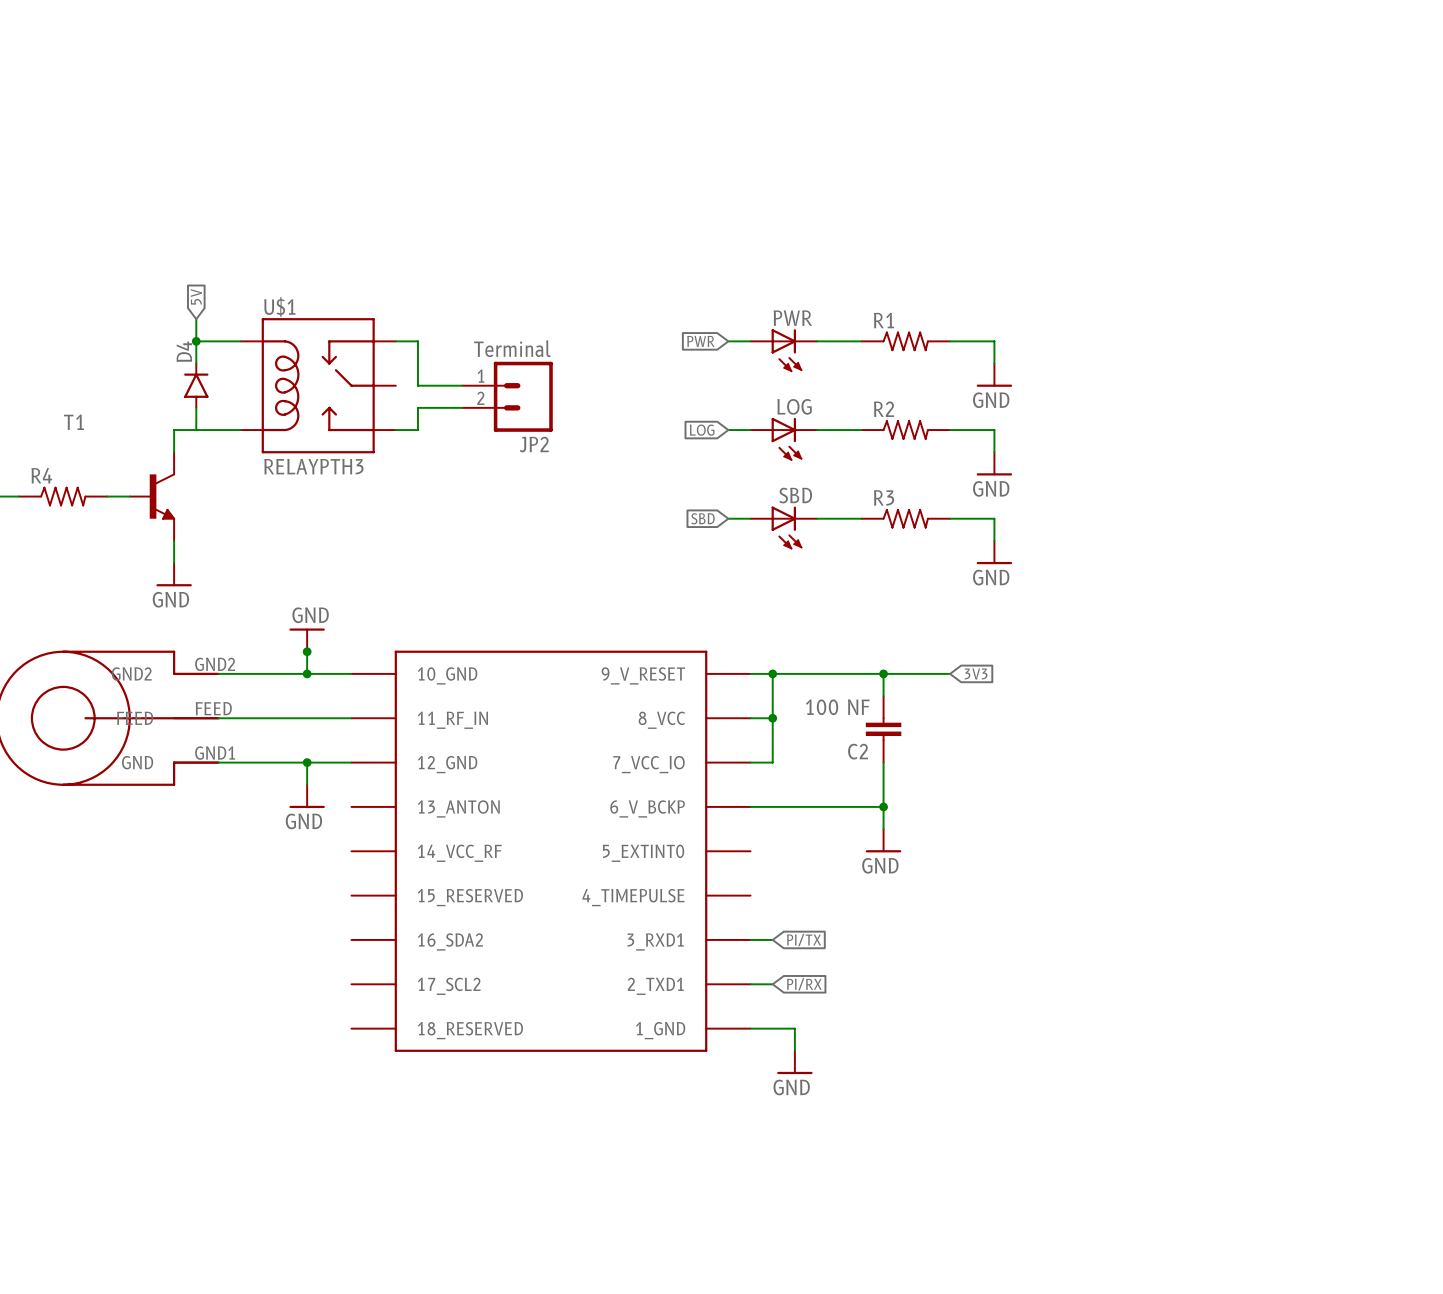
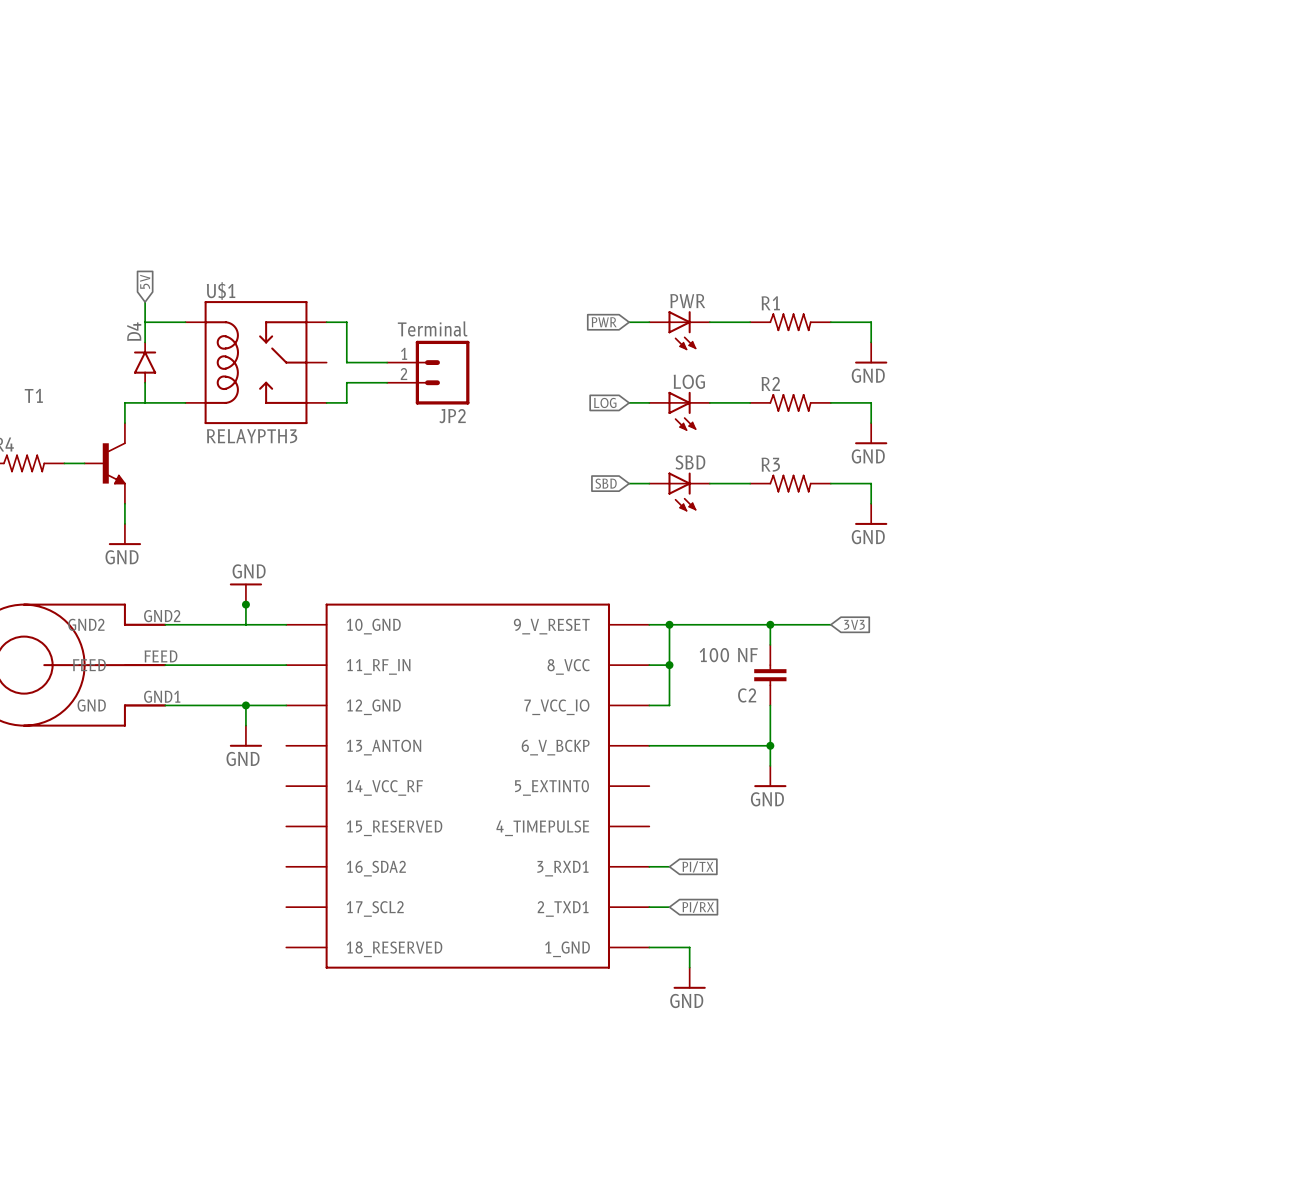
junction: (196, 341) -> none
junction: (307, 673) -> none

